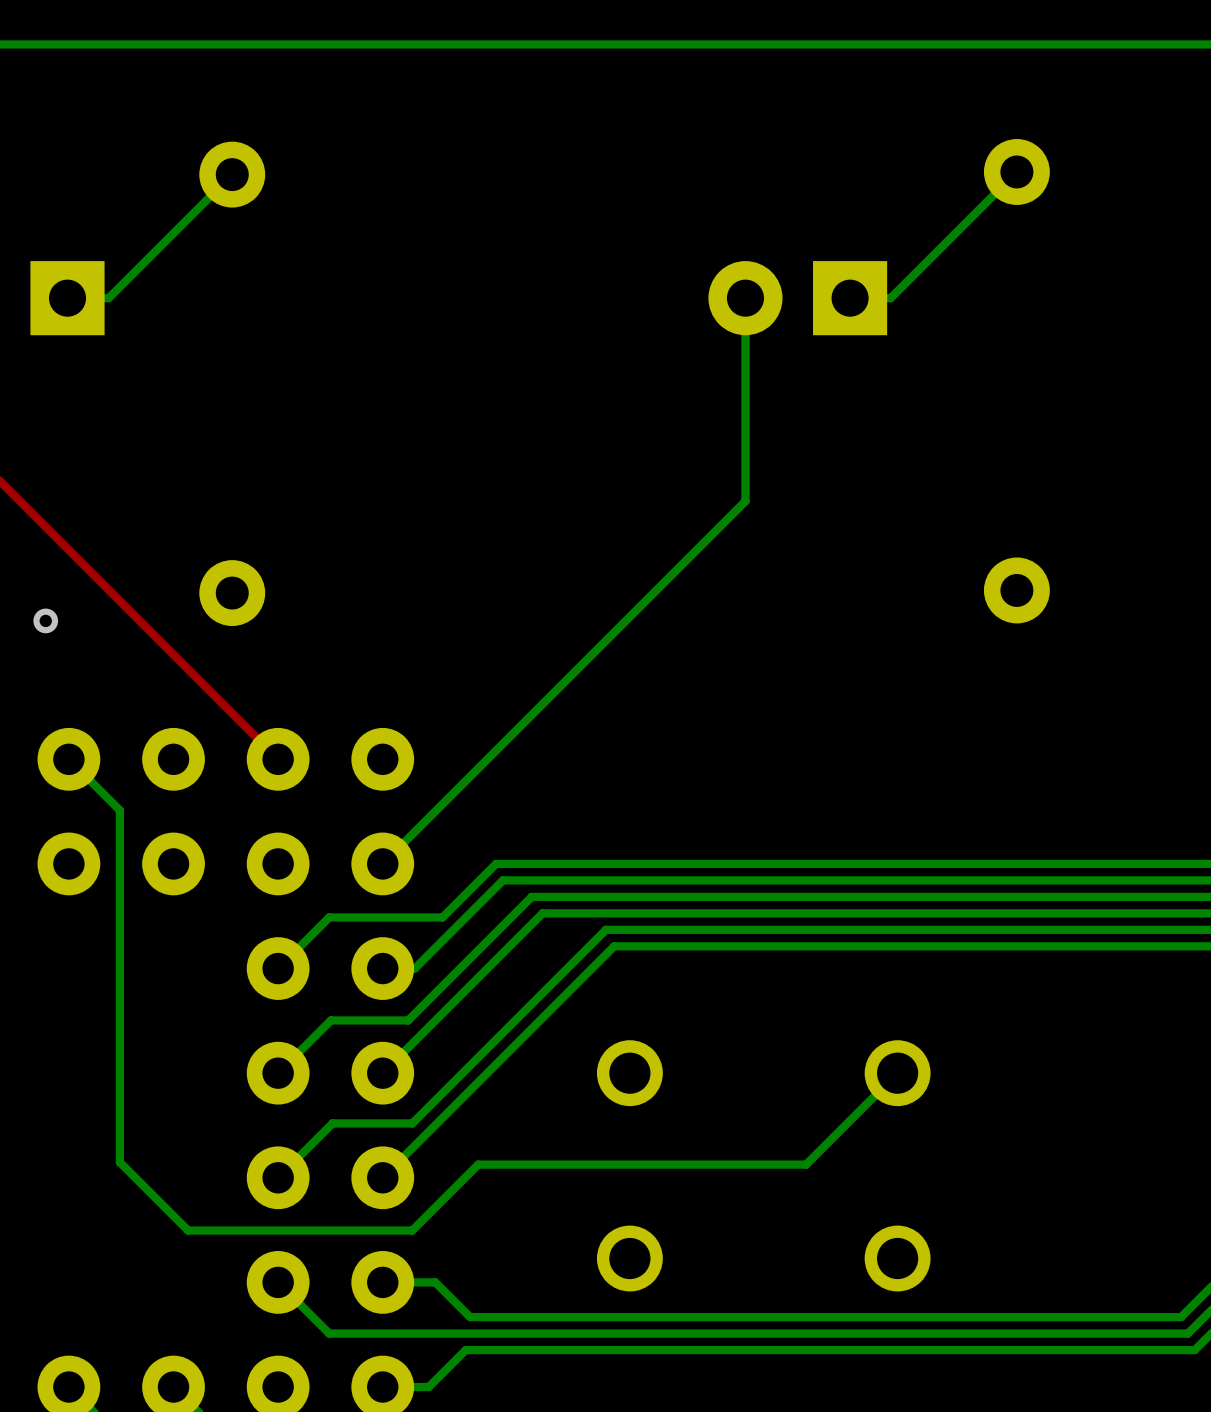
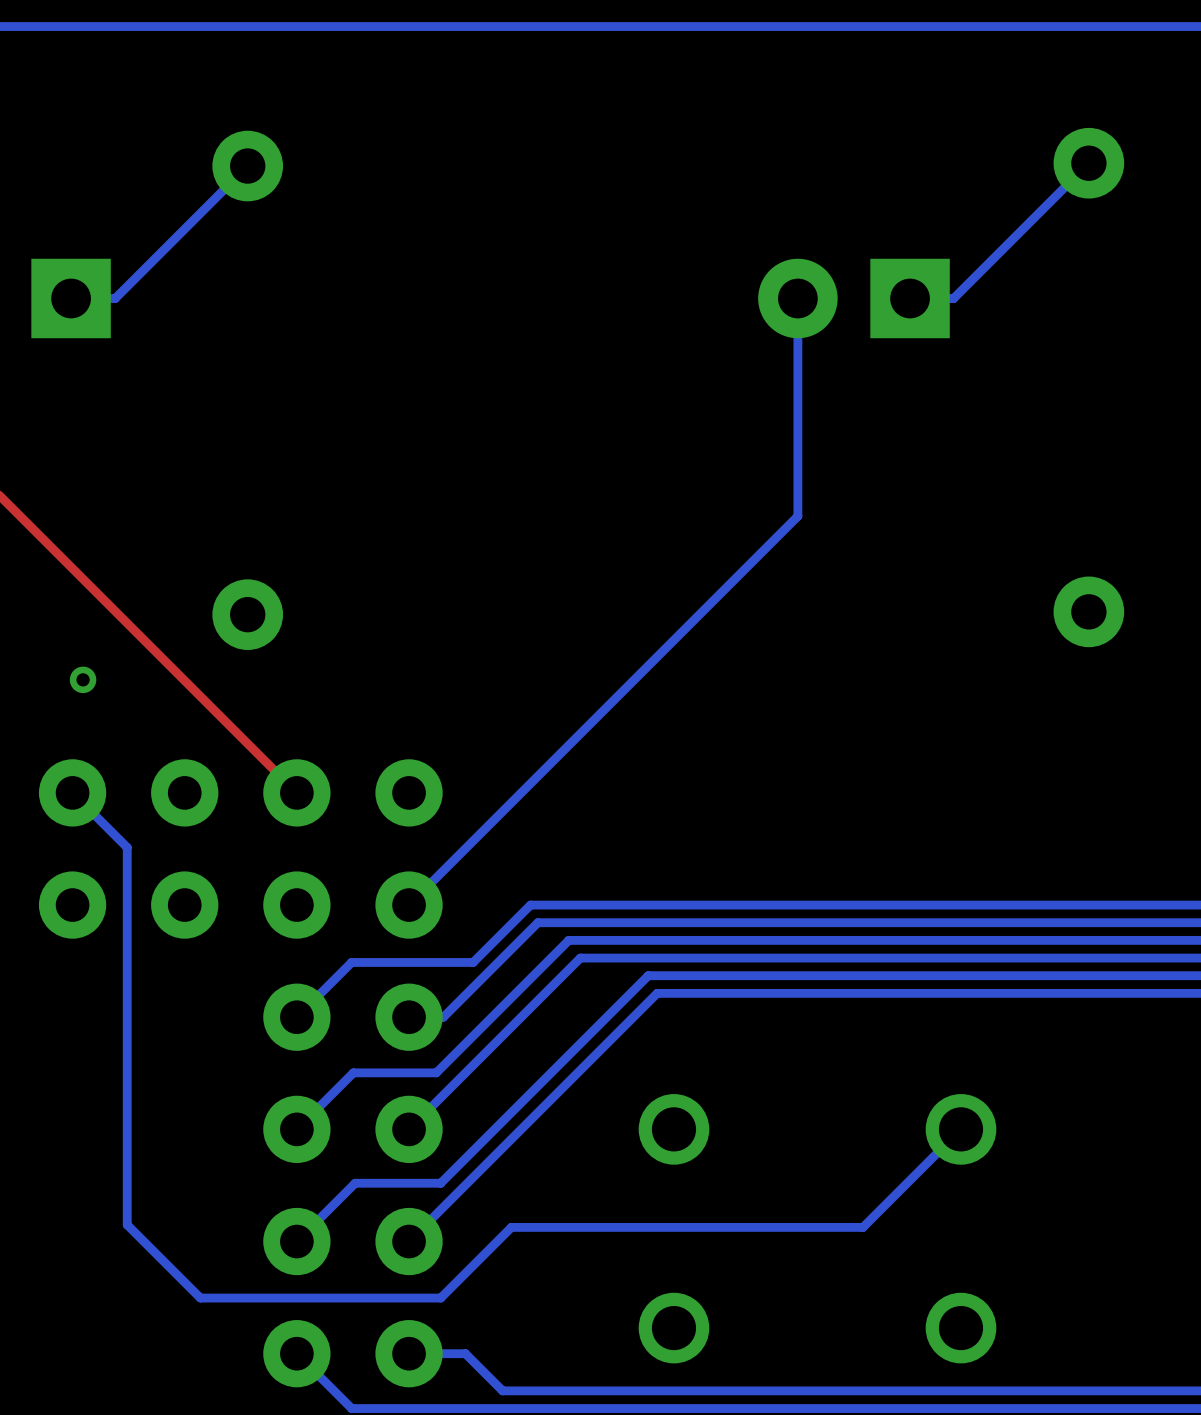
via position: (45, 620) -> (83, 679)

